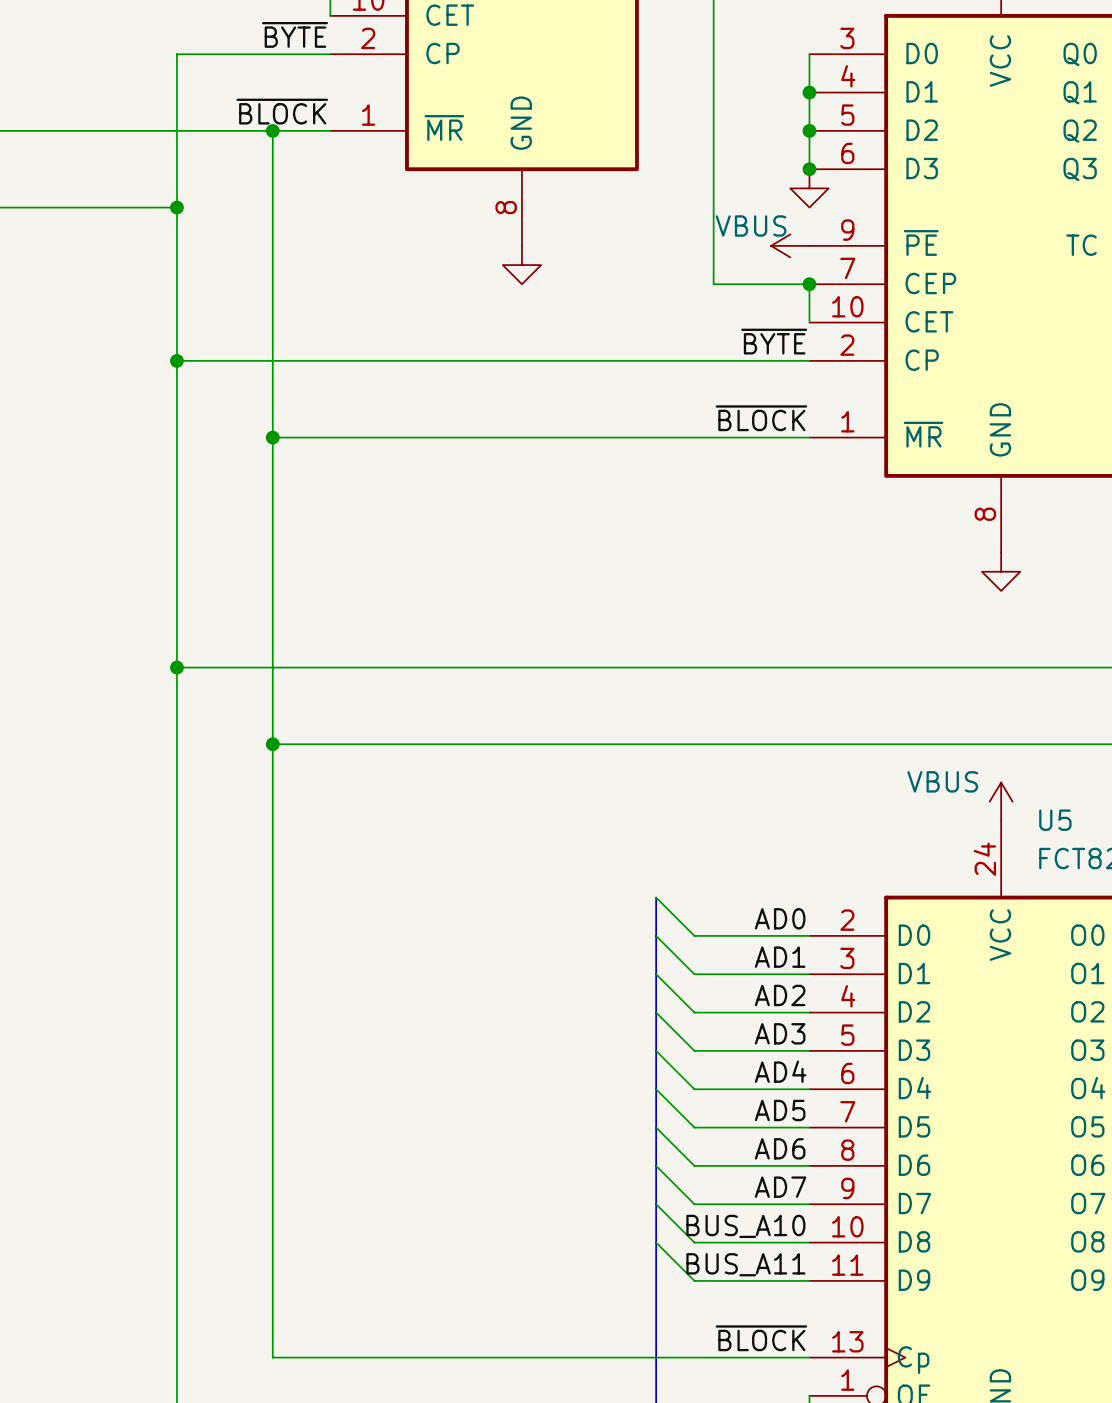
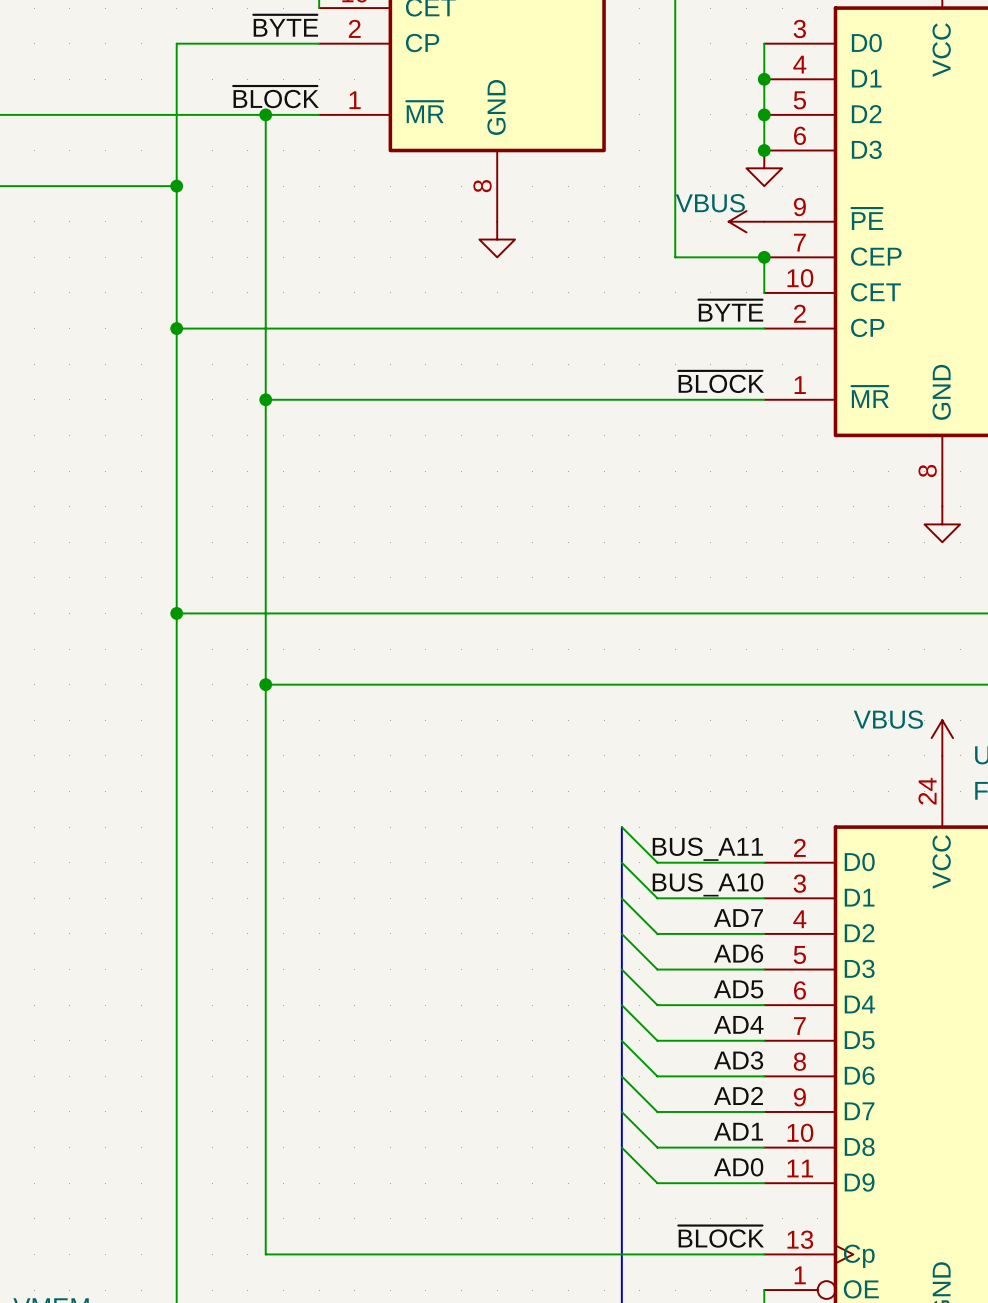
label: AD0 (780, 918) -> BUS_A11 (707, 849)
label: AD1 (780, 957) -> BUS_A10 (708, 884)
label: AD2 (780, 995) -> AD7 (738, 918)
label: AD3 (780, 1033) -> AD6 (738, 953)
label: AD4 (780, 1071) -> AD5 (738, 989)
label: AD5 (780, 1110) -> AD4 (738, 1024)
label: AD6 (780, 1148) -> AD3 (738, 1060)
label: AD7 (780, 1187) -> AD2 (738, 1095)
label: BUS_A10 (745, 1226) -> AD1 (738, 1131)
label: BUS_A11 (745, 1264) -> AD0 (738, 1167)

